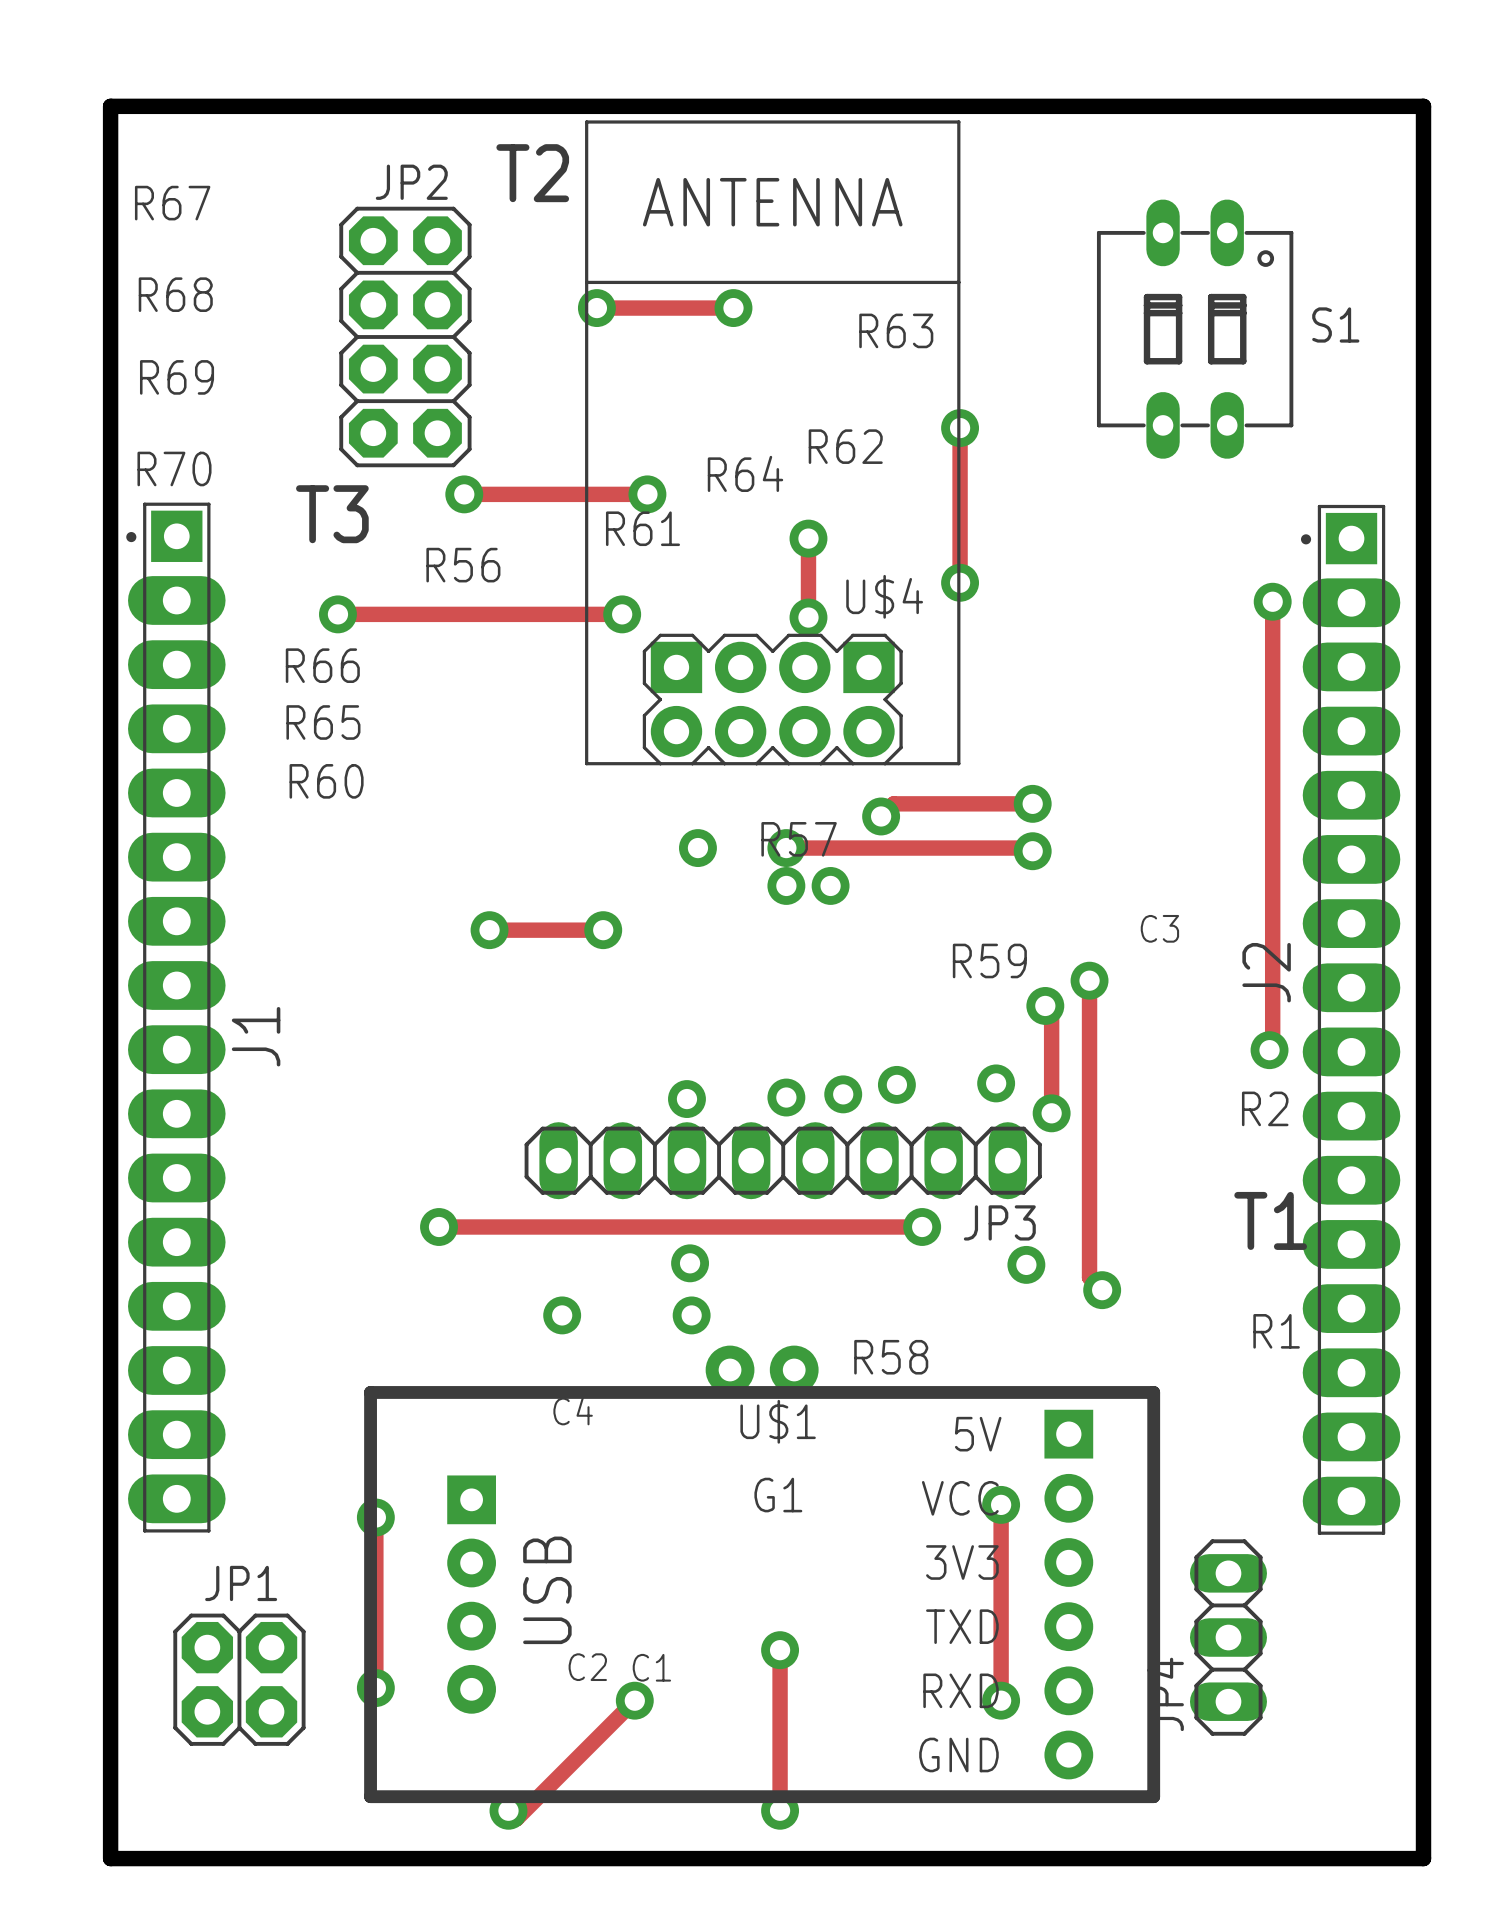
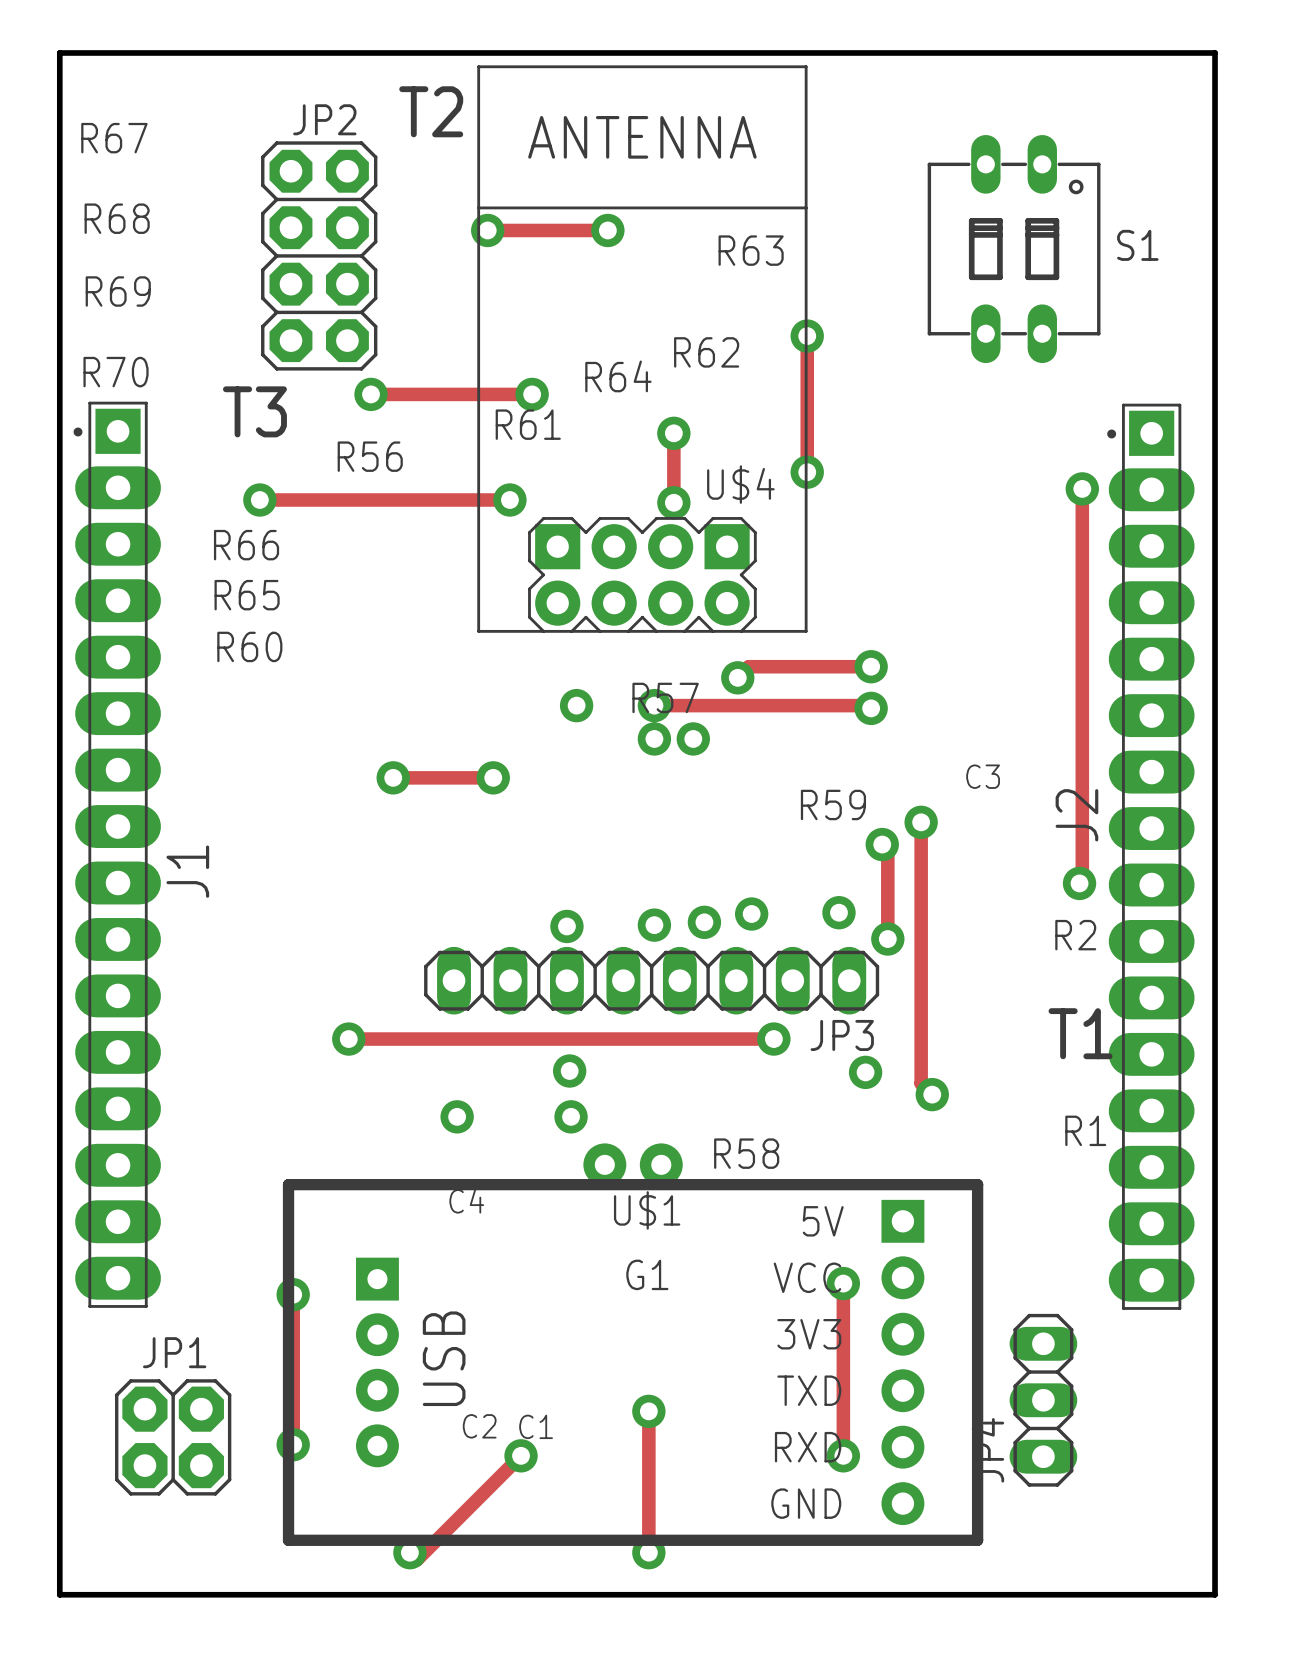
board edge width: thick (110, 106) (1423, 106) (1423, 1858) (110, 1858) (110, 106) -> thin (59, 52) (1215, 52) (1215, 1594) (59, 1594) (59, 52)

